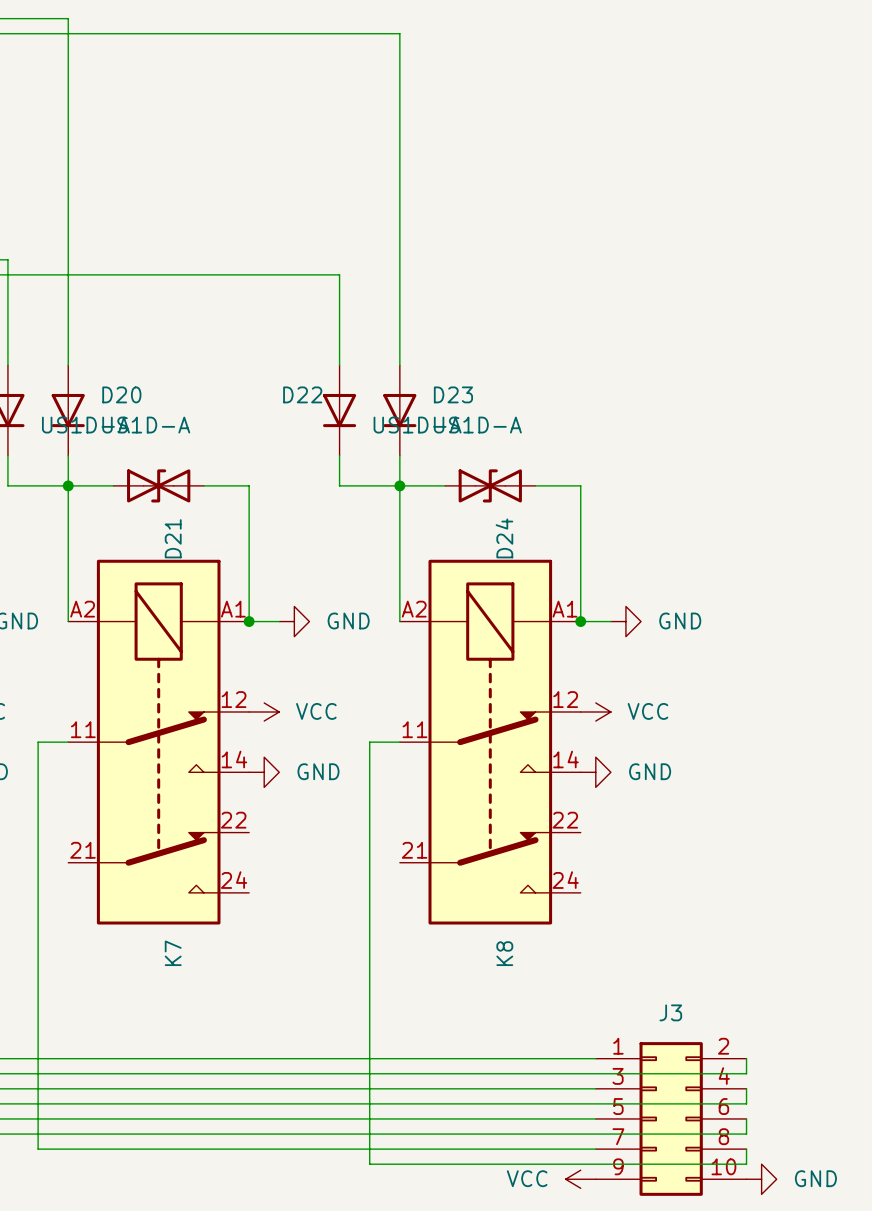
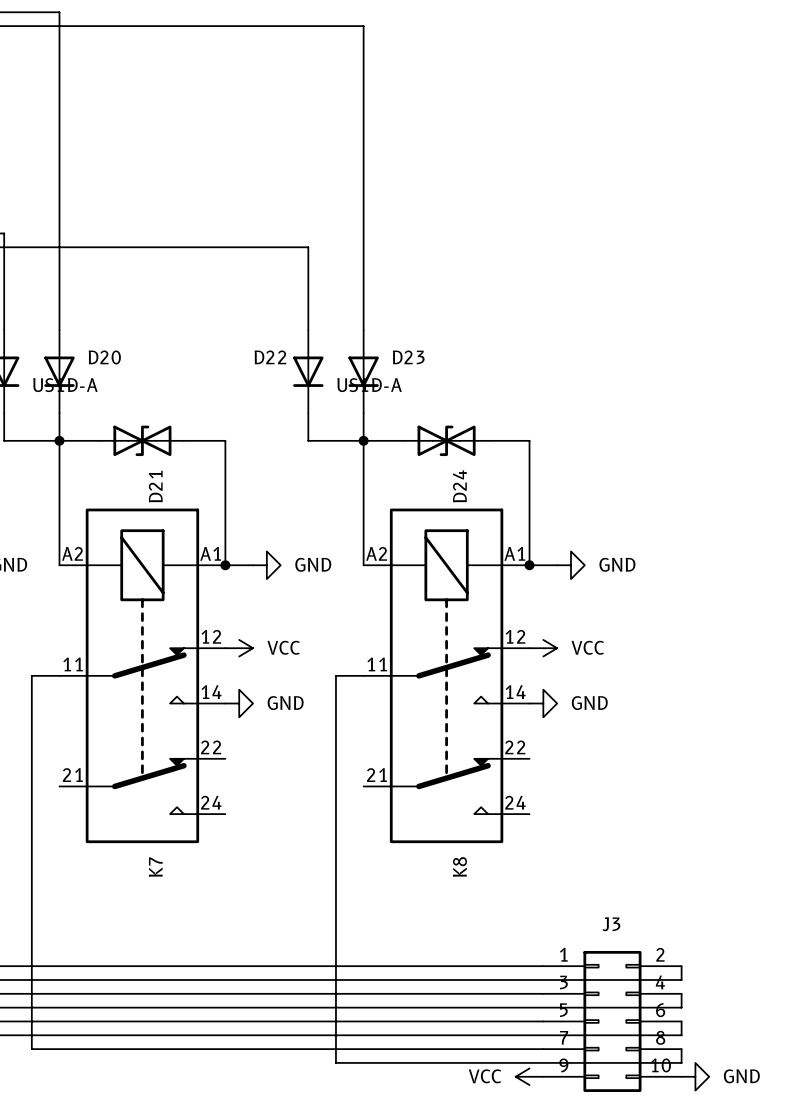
D20 value: US1D-A (146, 425) -> none
D23 value: US1D-A (477, 425) -> none

